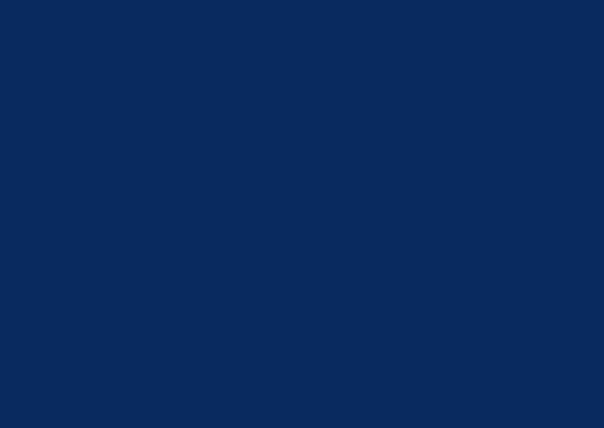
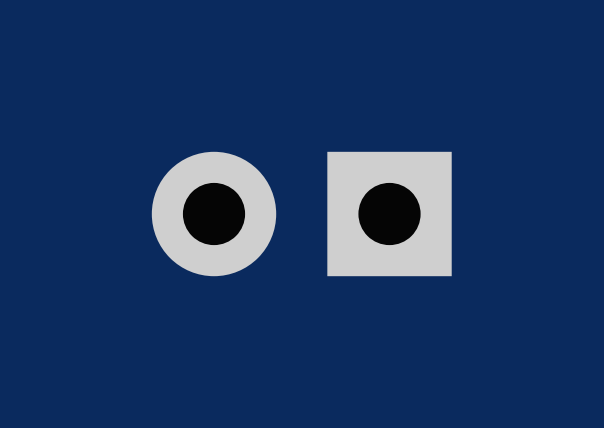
part: none -> (301, 214)

